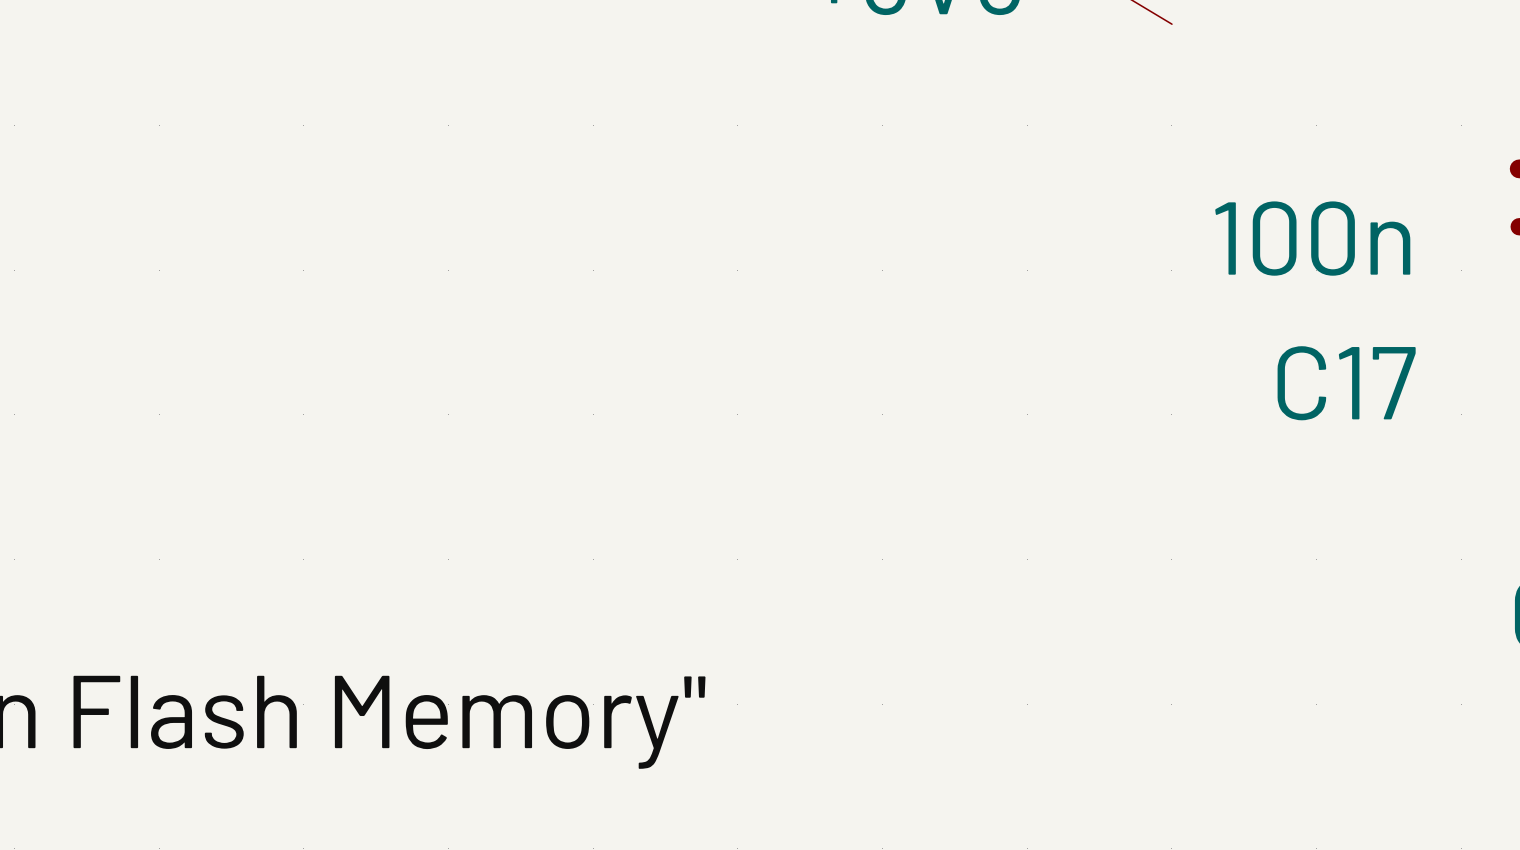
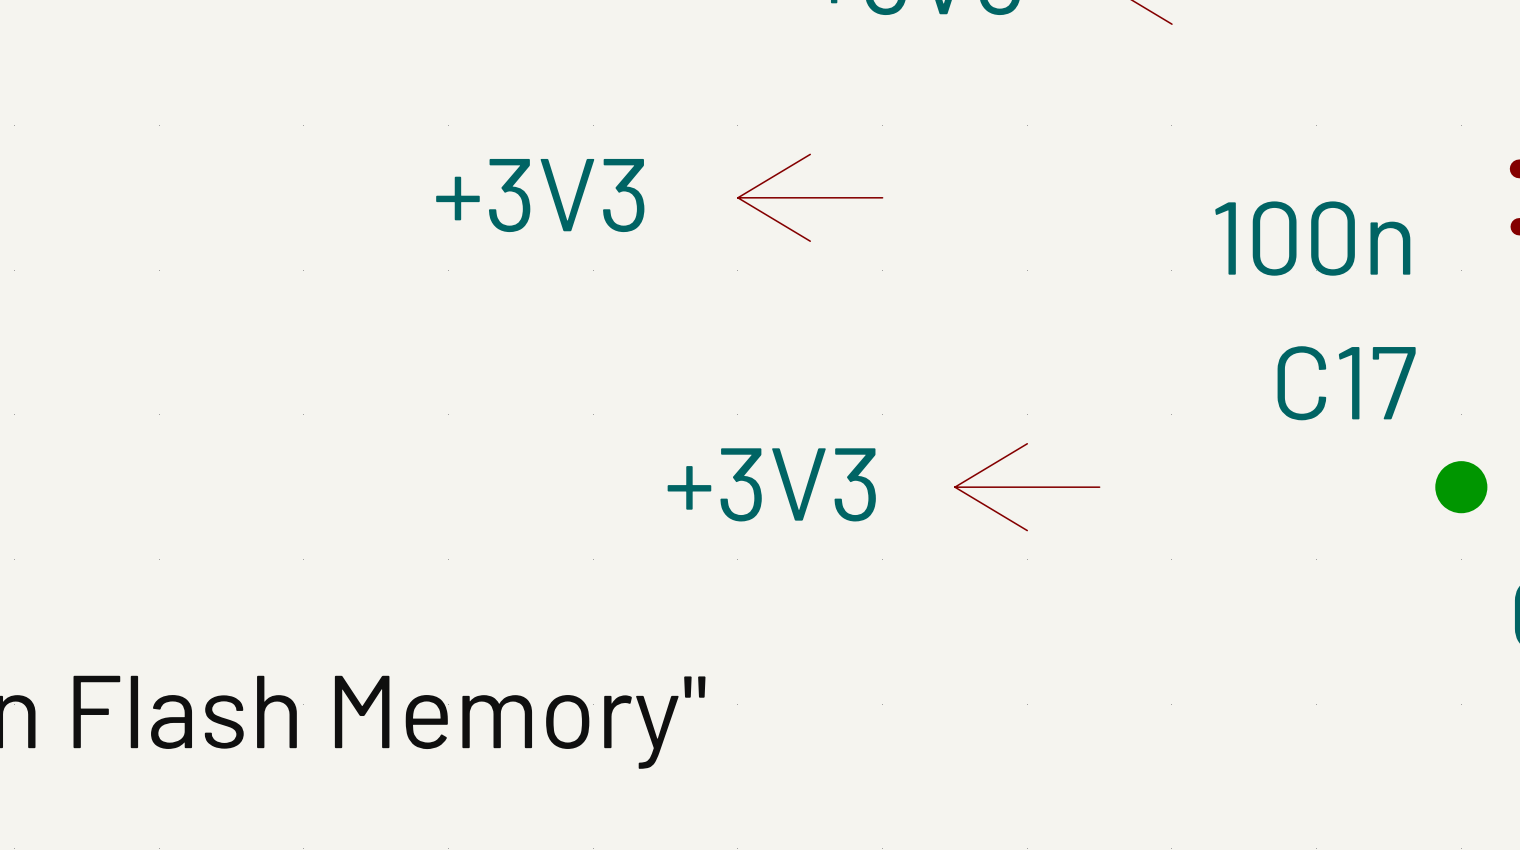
power symbol: none -> +3V3 (810, 197)
power symbol: none -> +3V3 (1027, 487)
junction: none -> (1461, 487)

